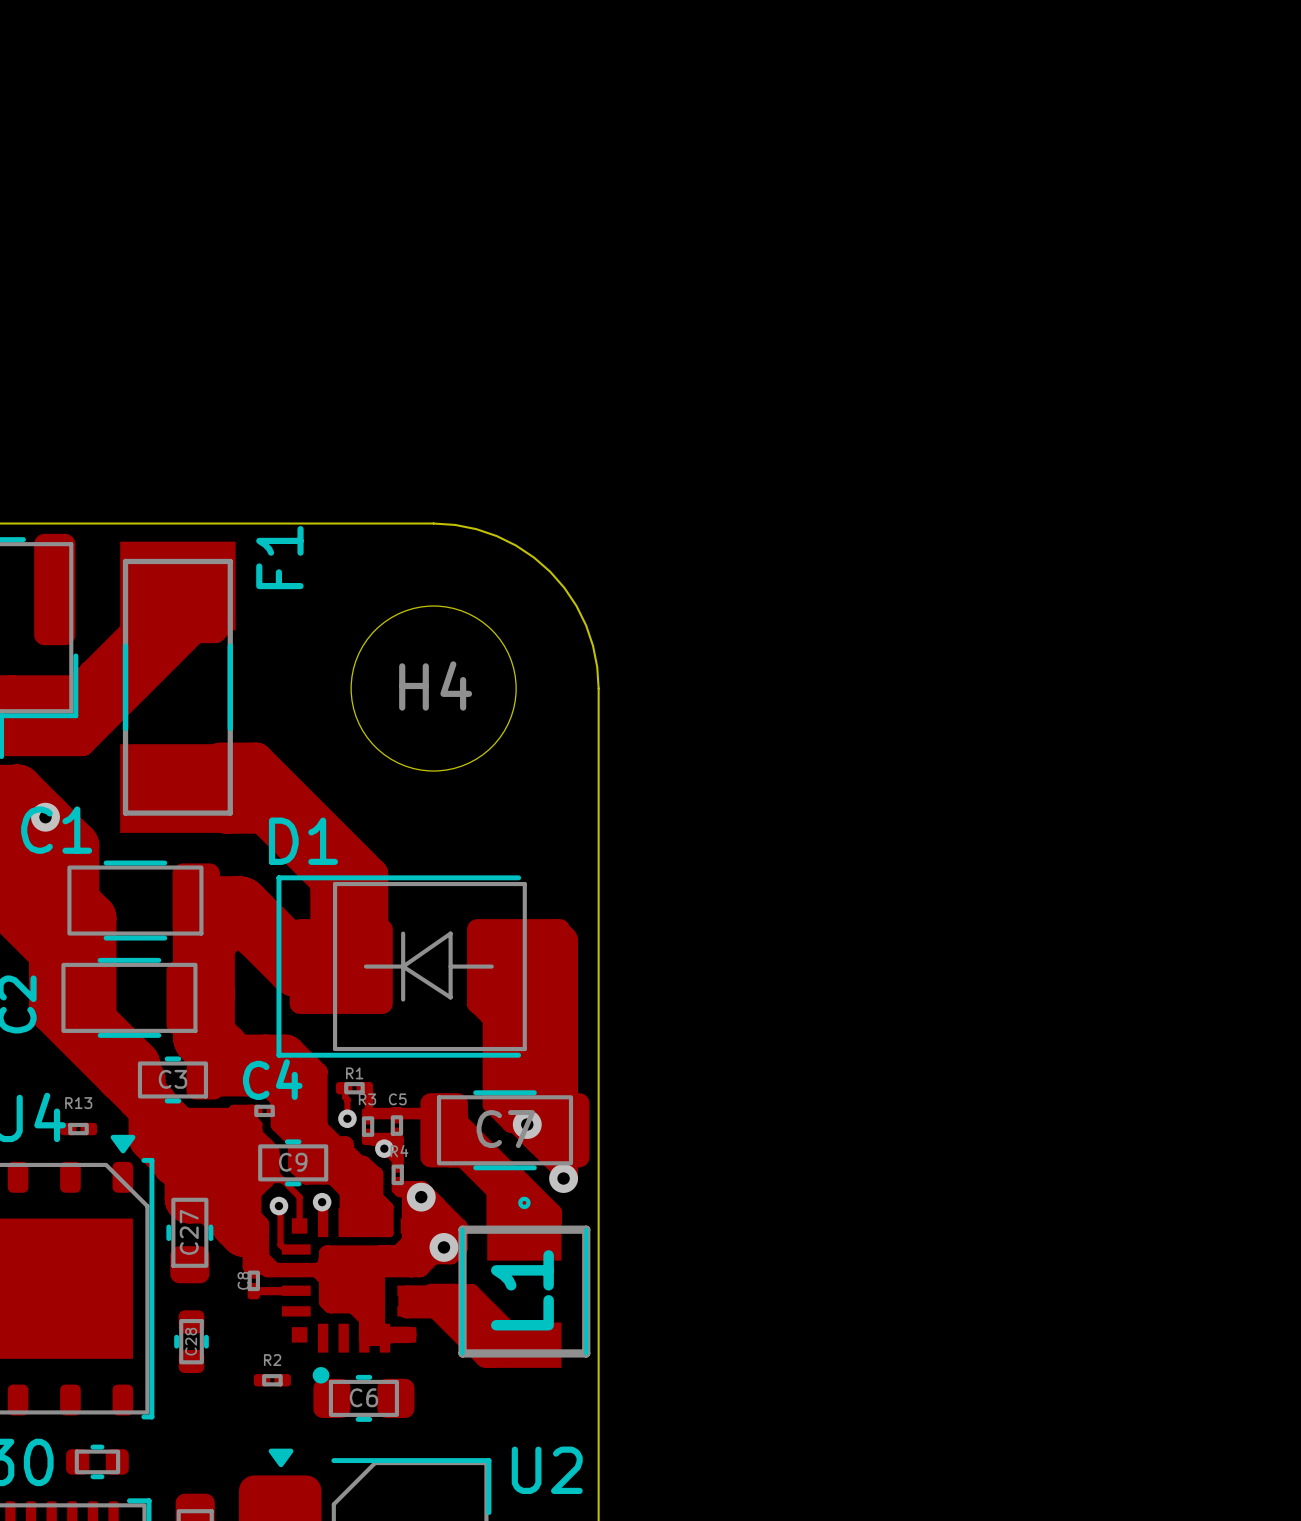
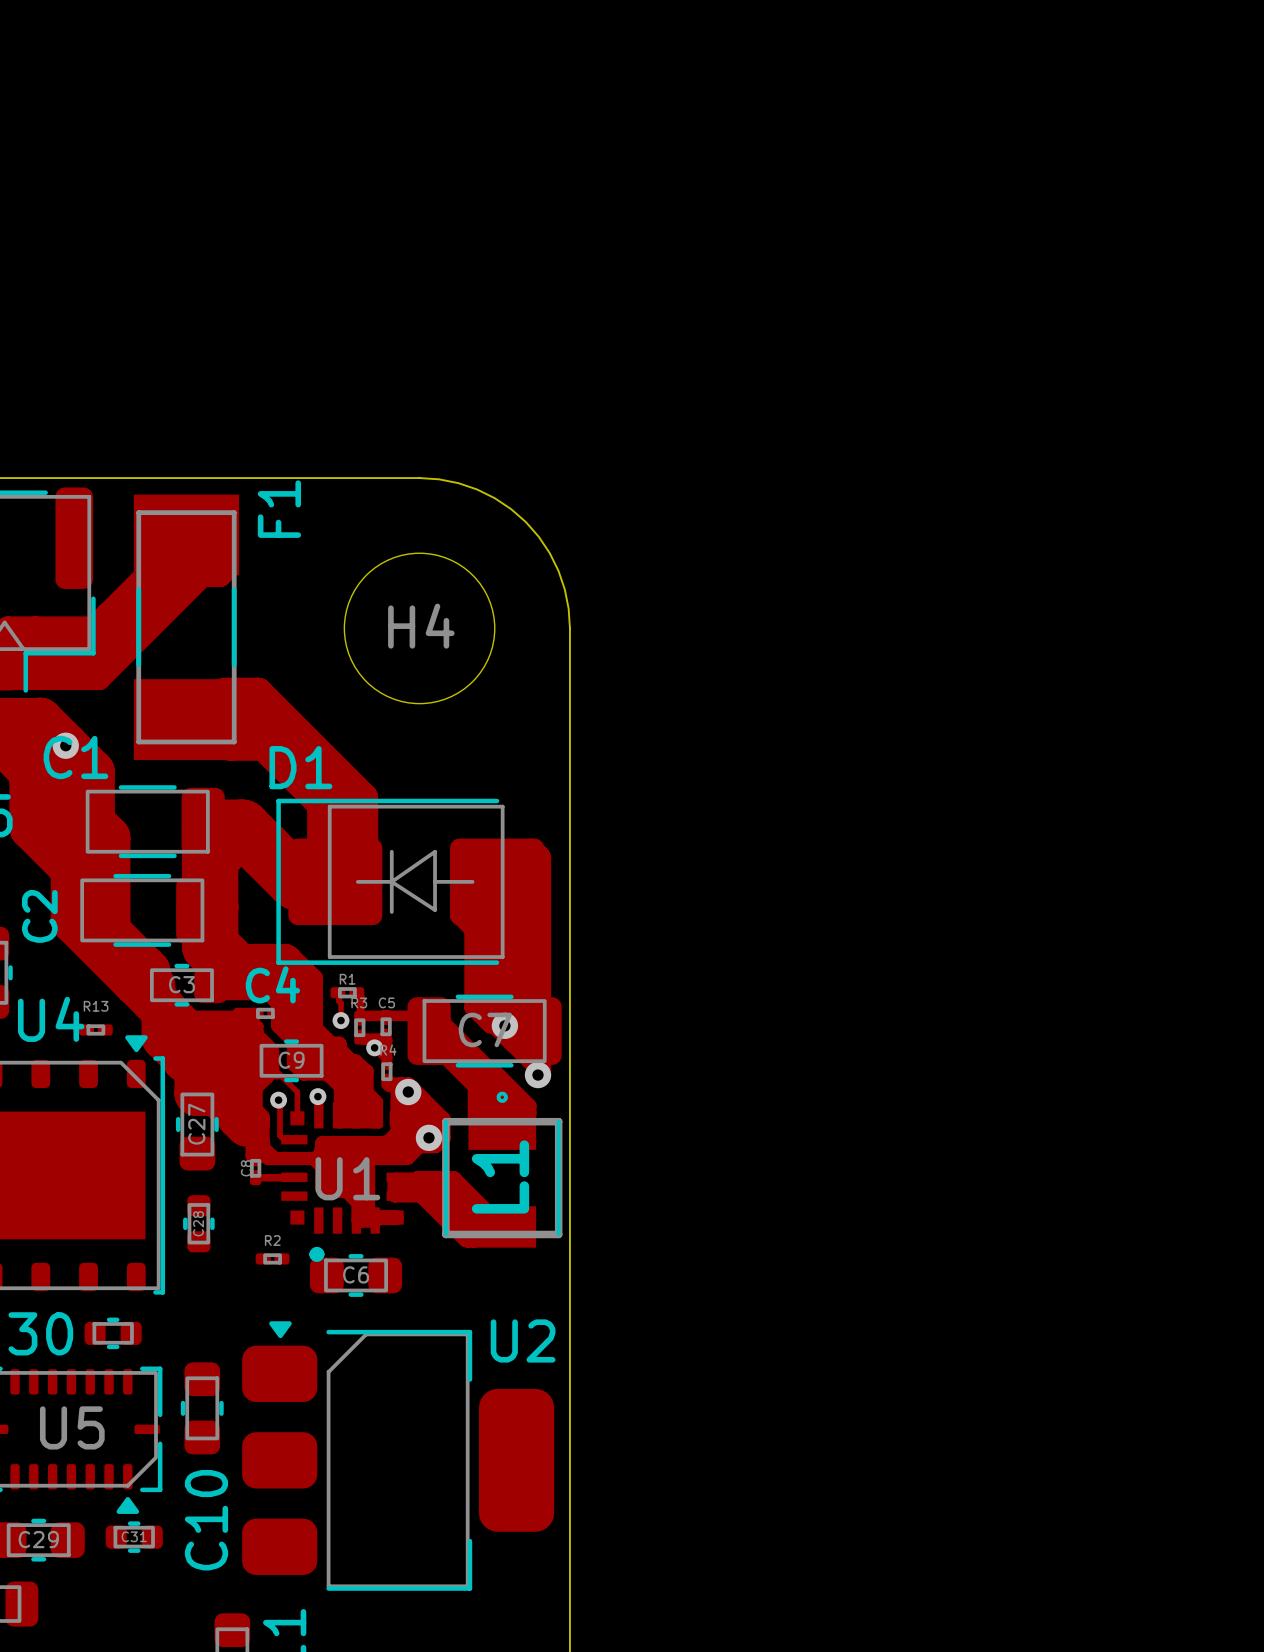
part text: none -> U1 (347, 1178)

